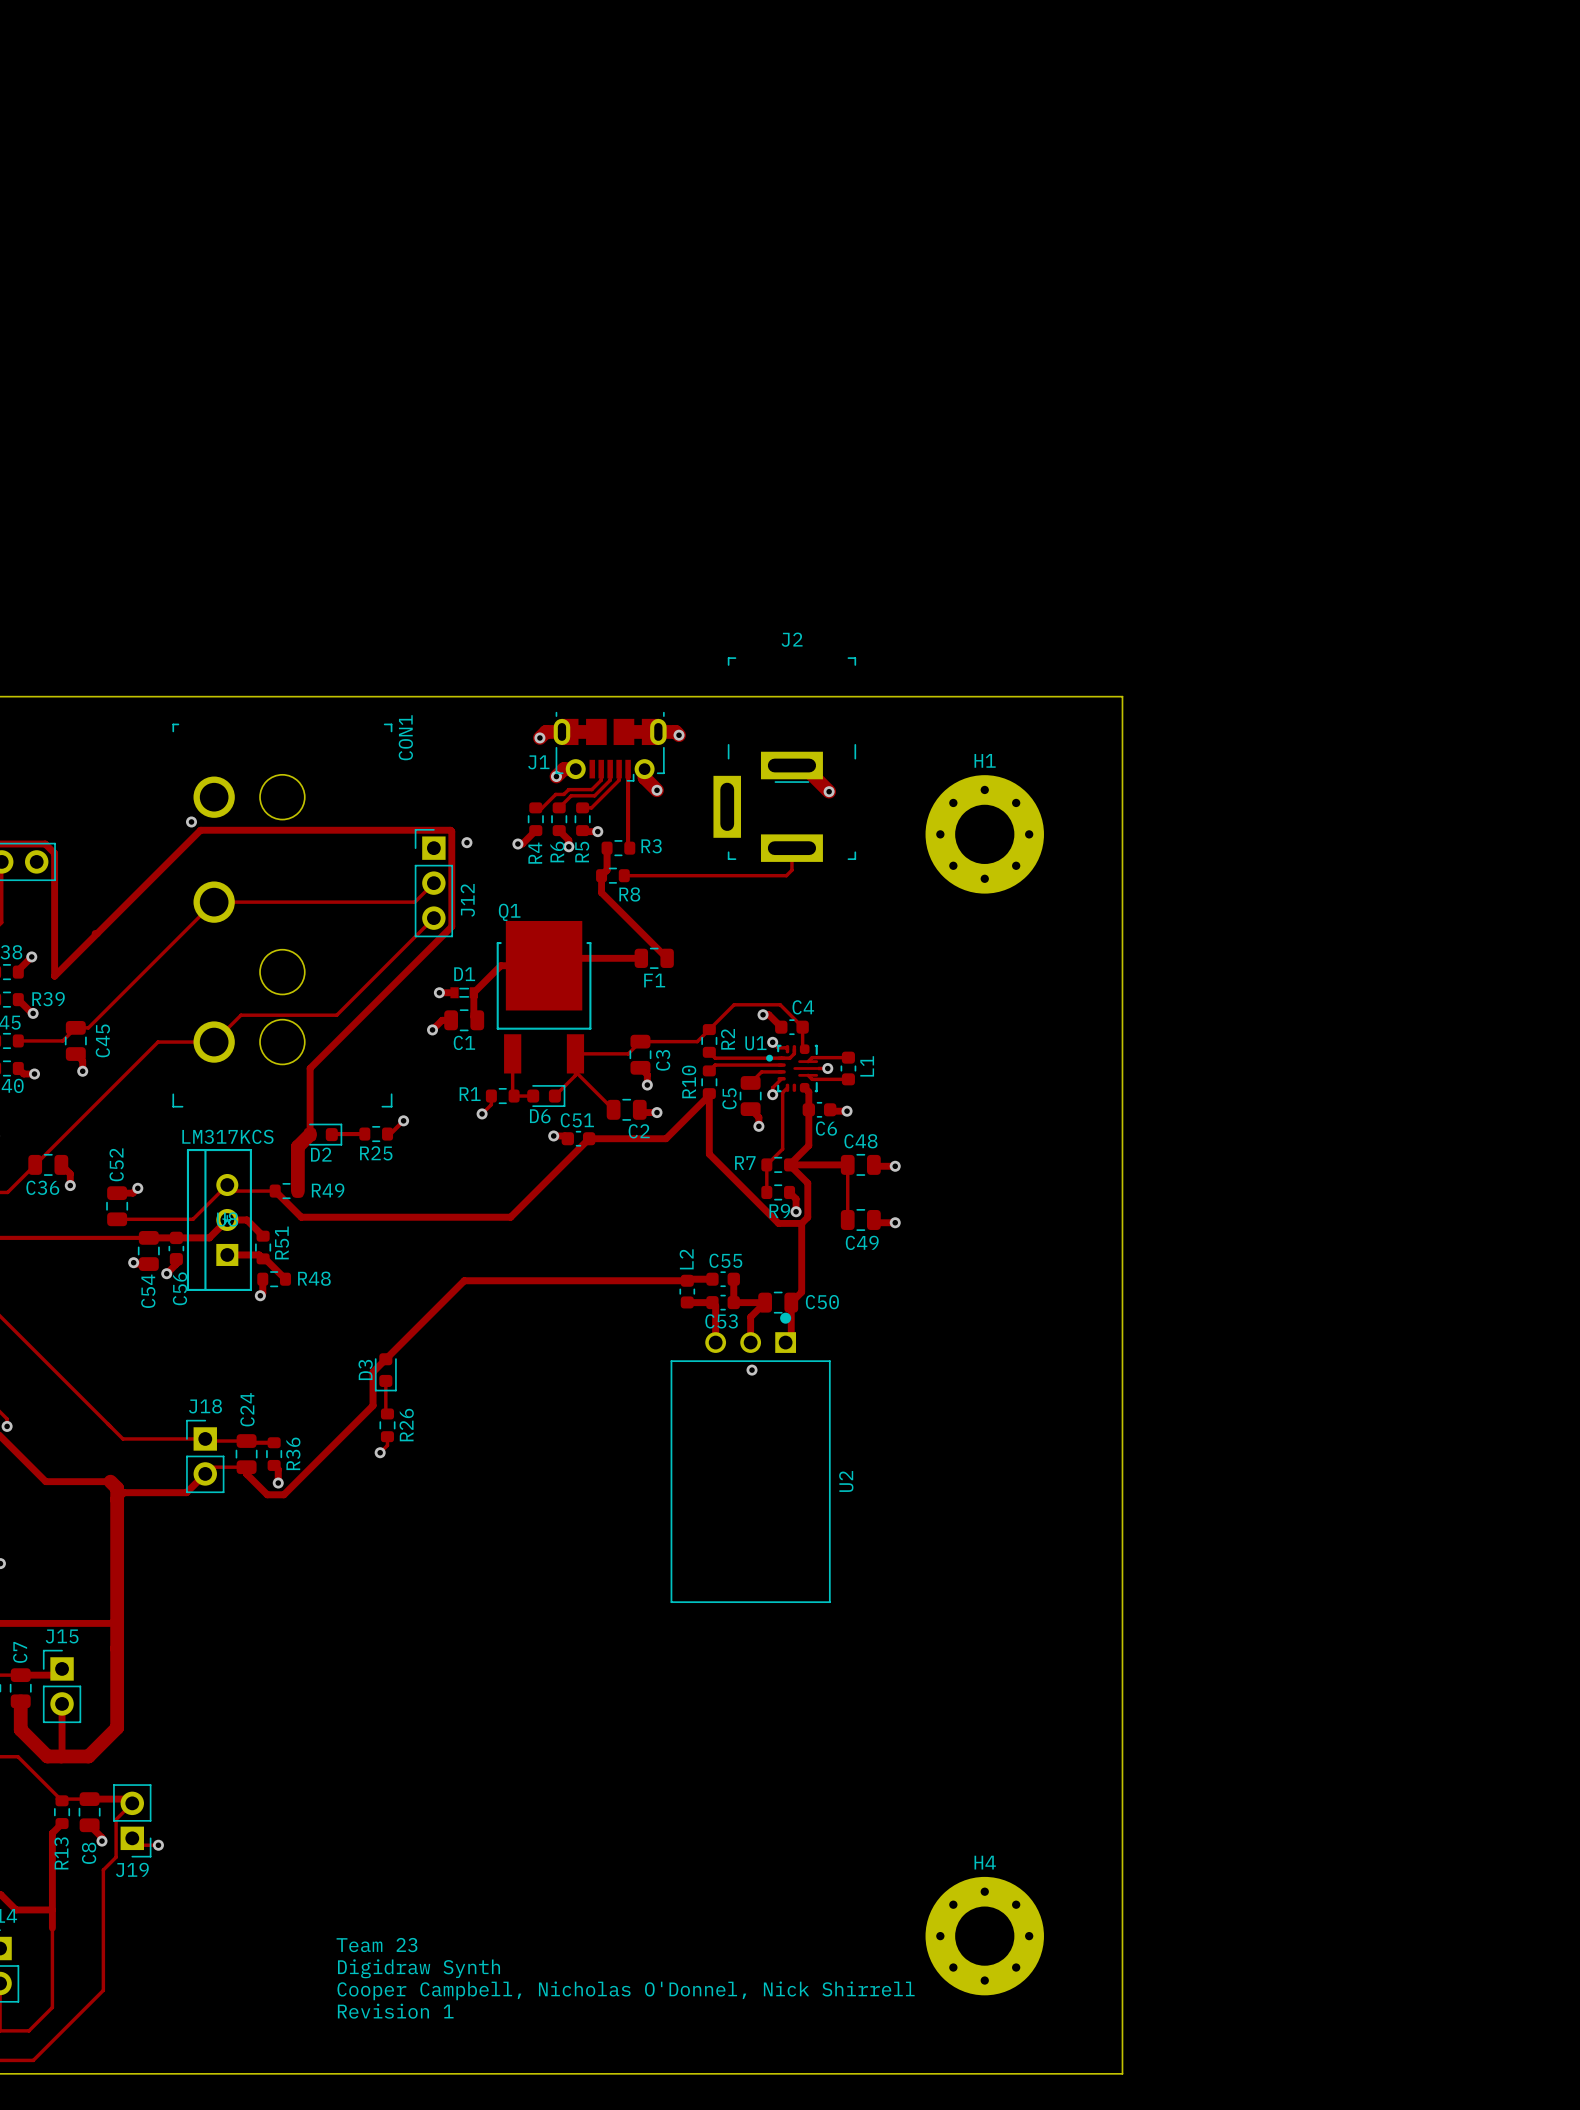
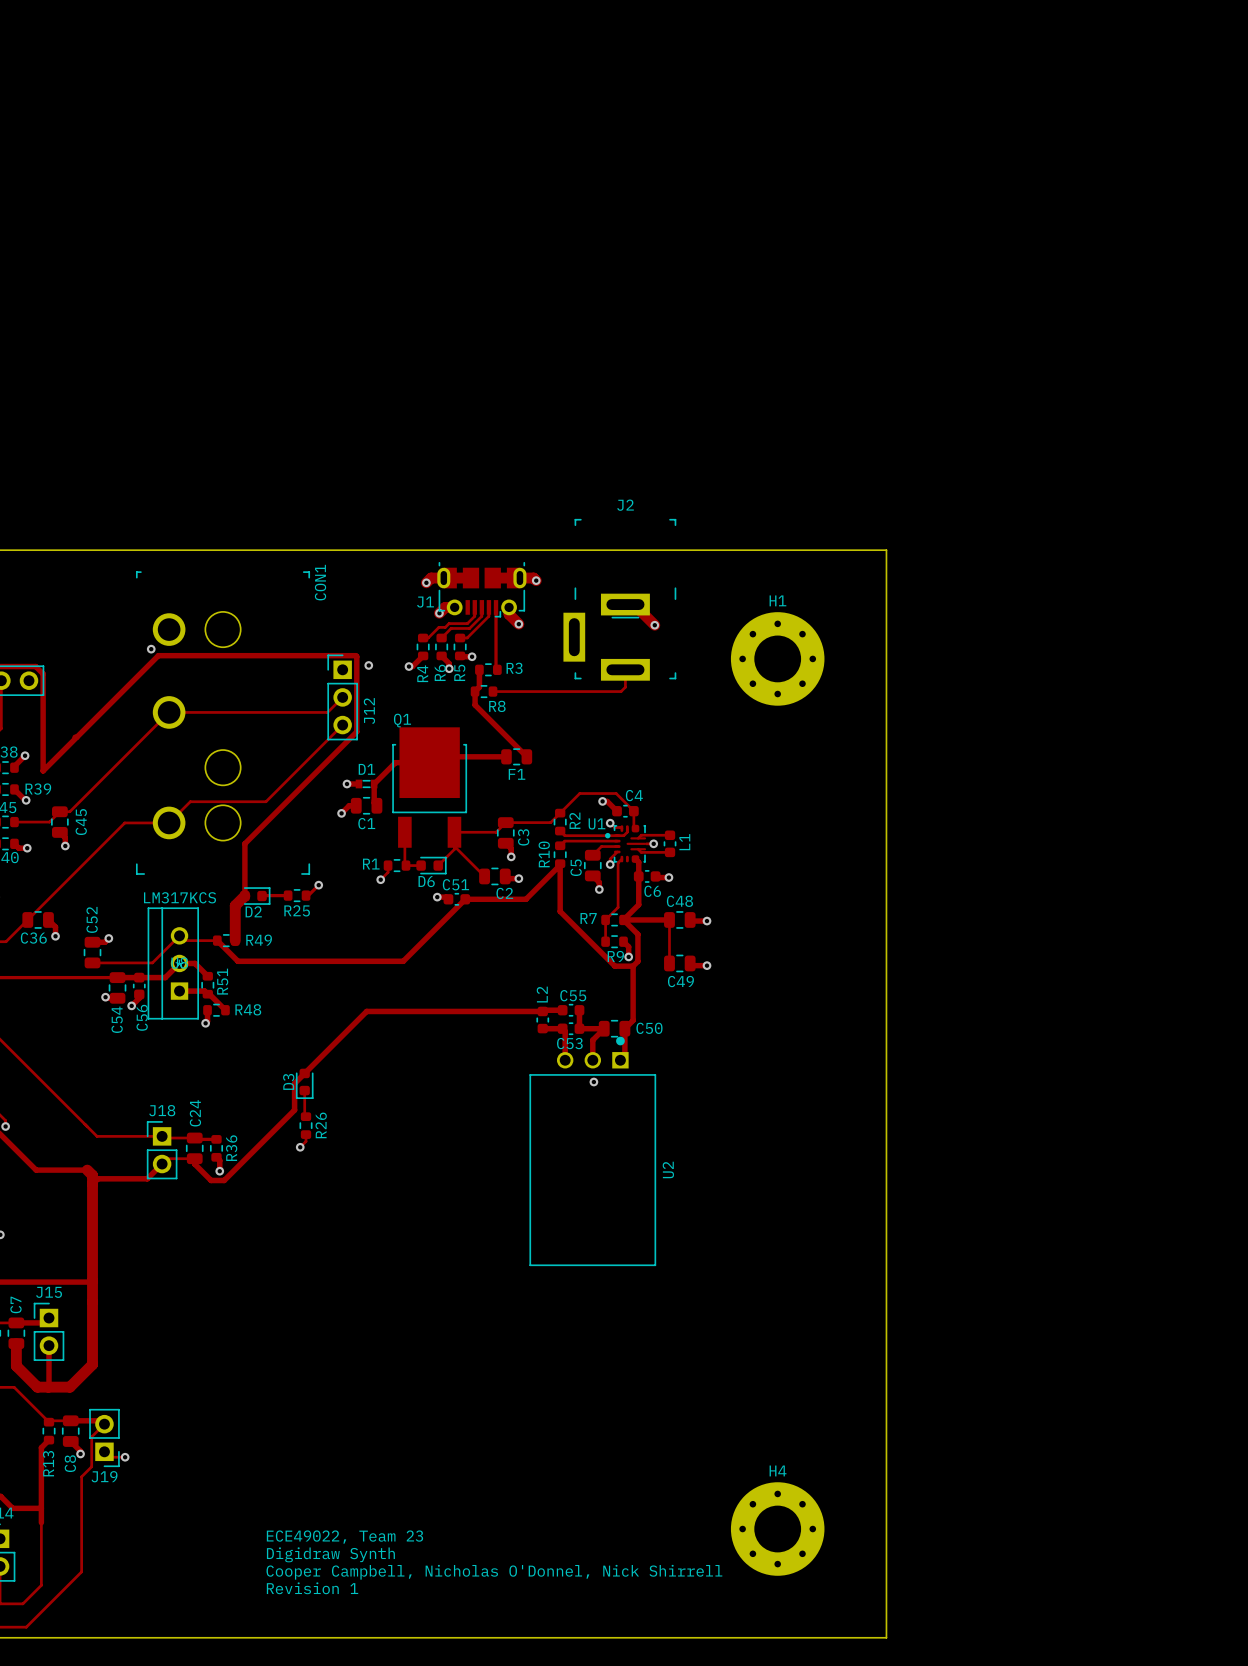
text: Team 23 (376, 1945) -> ECE49022, Team 23 (344, 1537)

